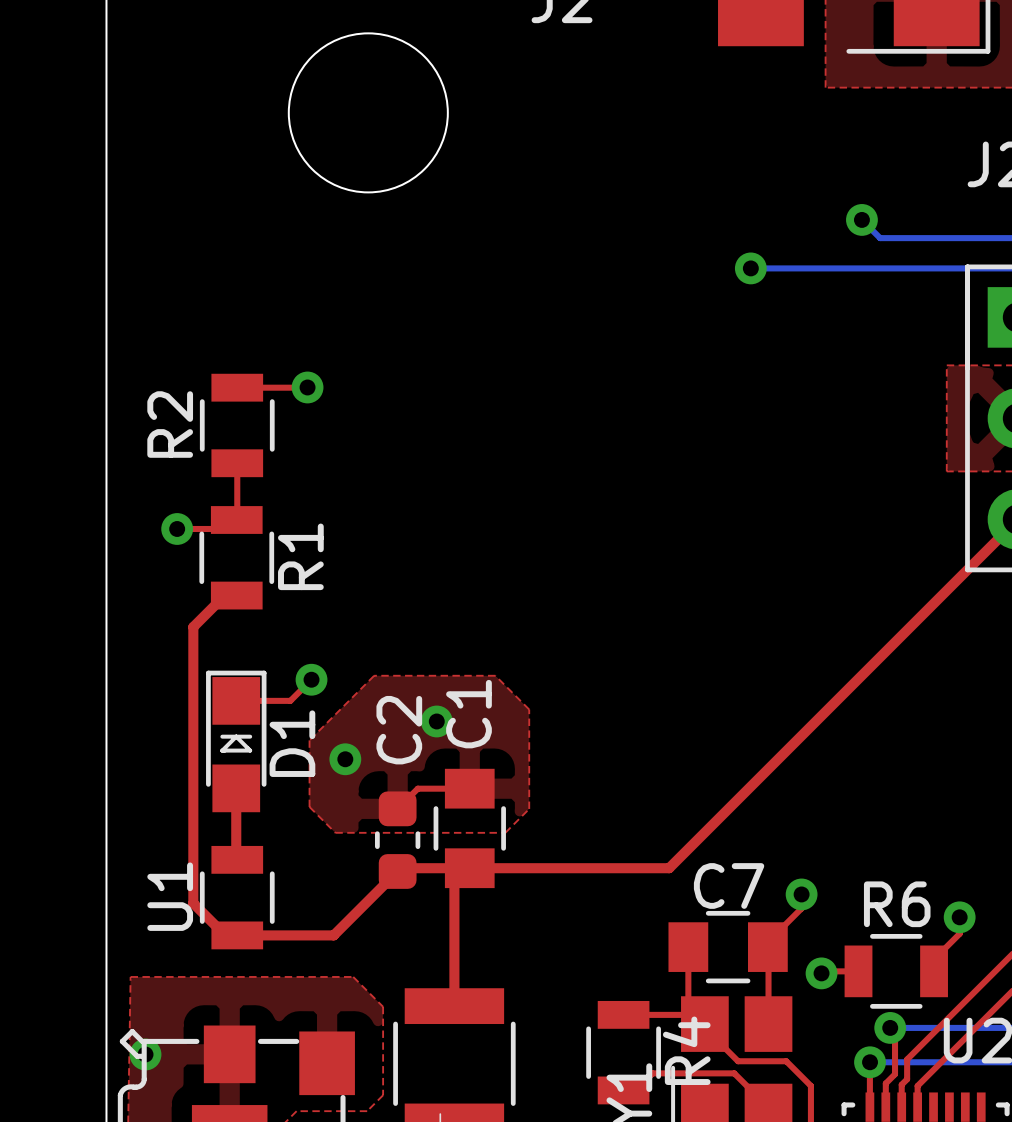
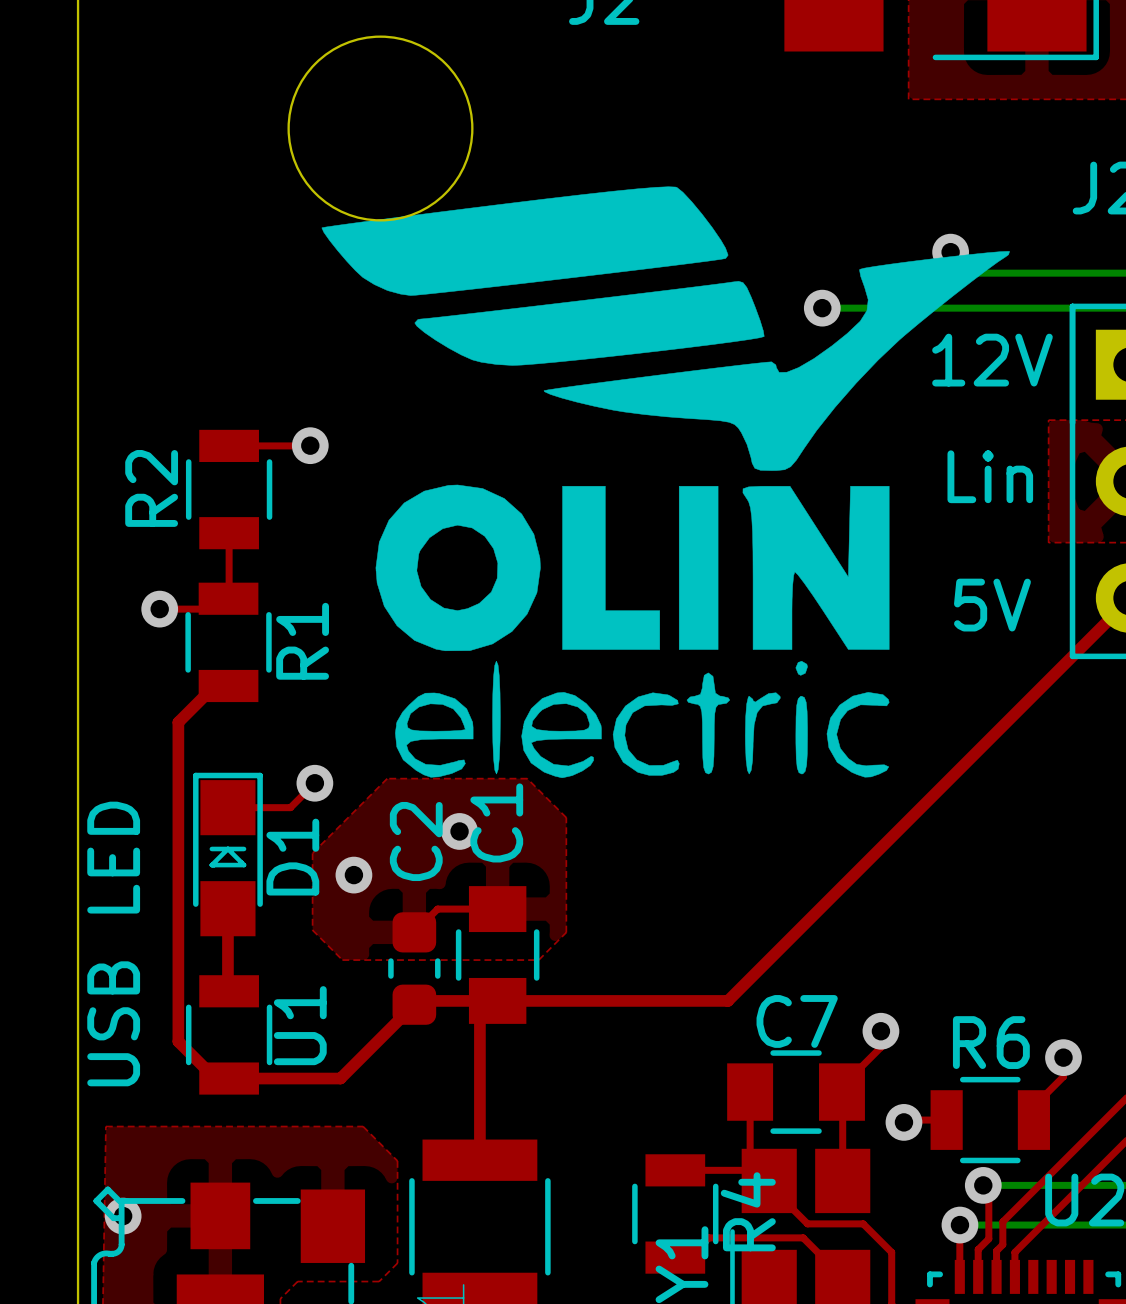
drawing: none -> [321, 186, 1010, 778]
text: none -> 12V (992, 360)
text: none -> Lin (990, 476)
text: none -> 5V (992, 605)
text: none -> USB LED (113, 943)
U1 name position: U1 (170, 896) -> U1 (300, 1025)

